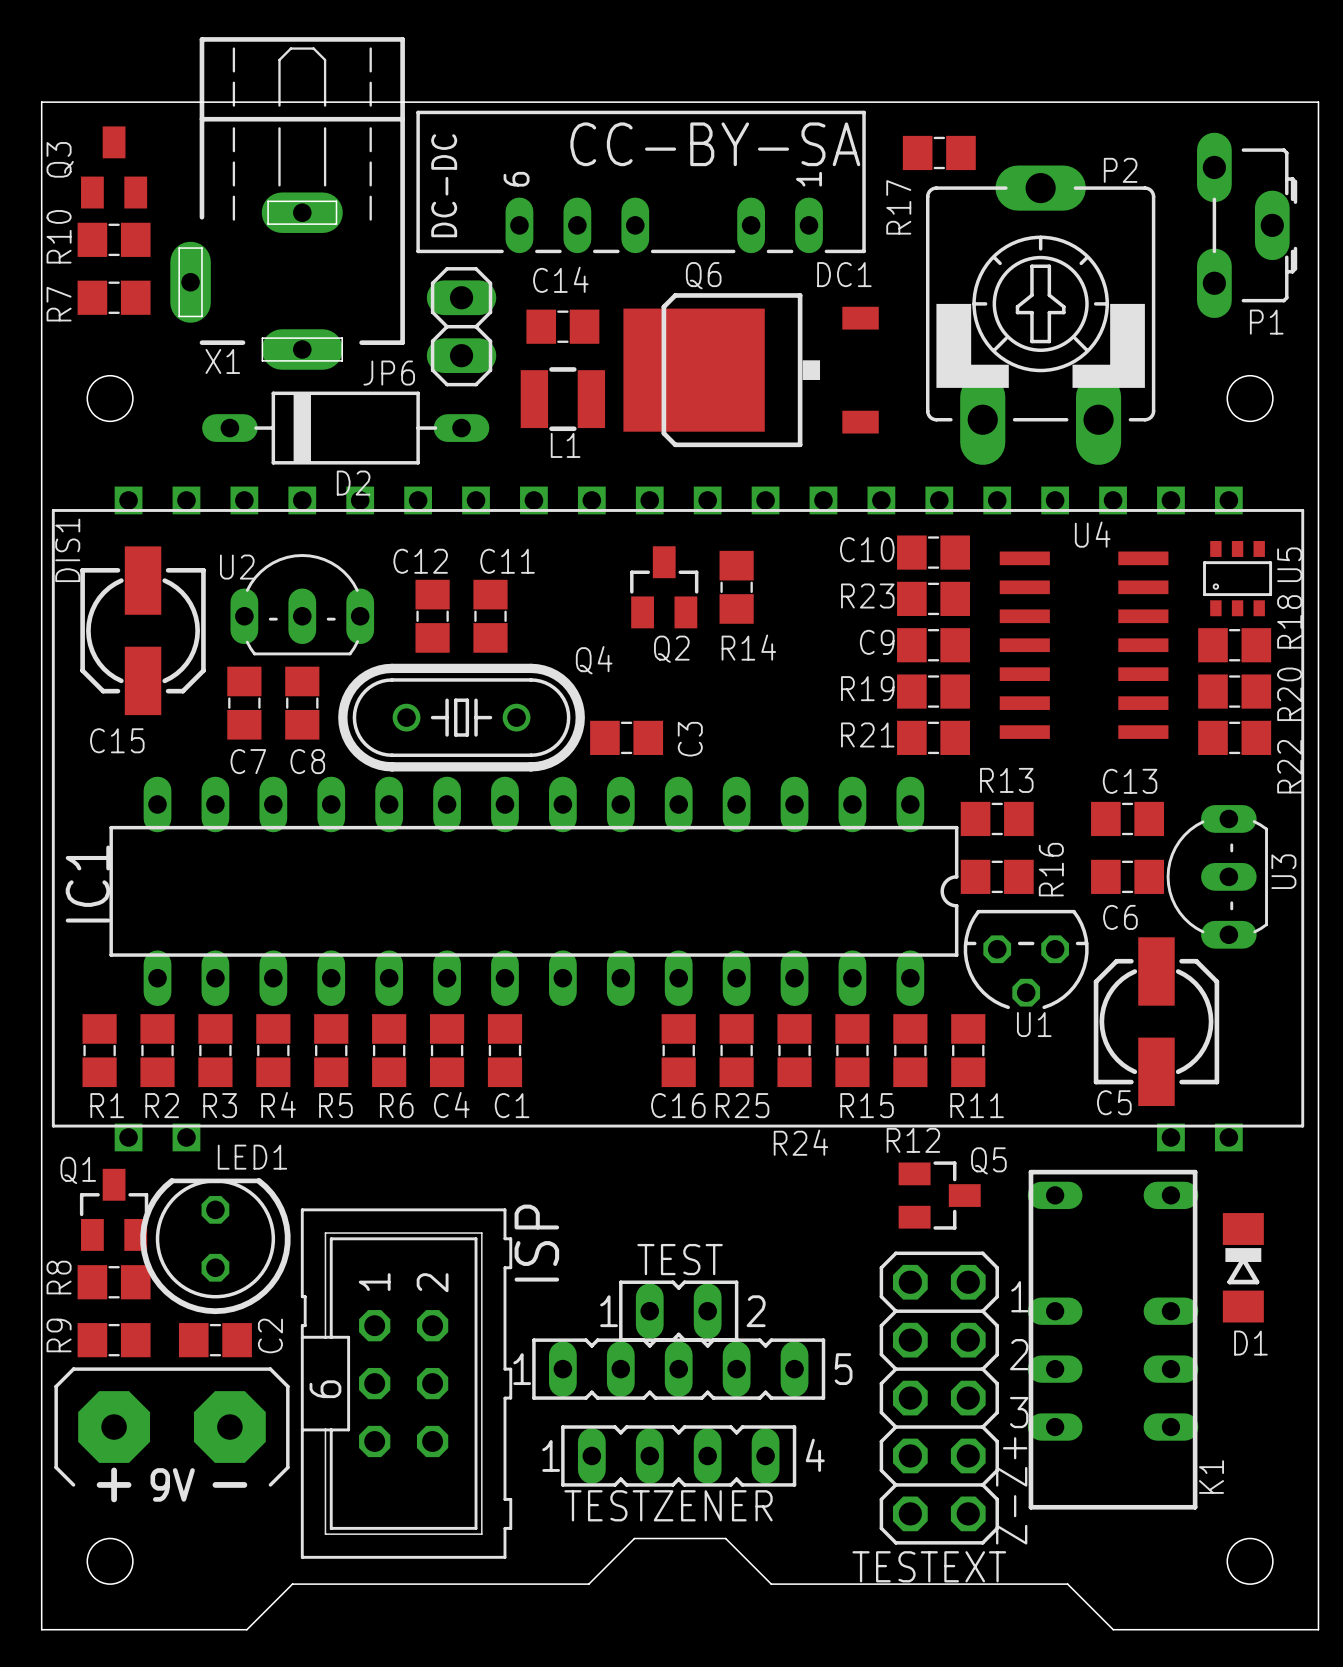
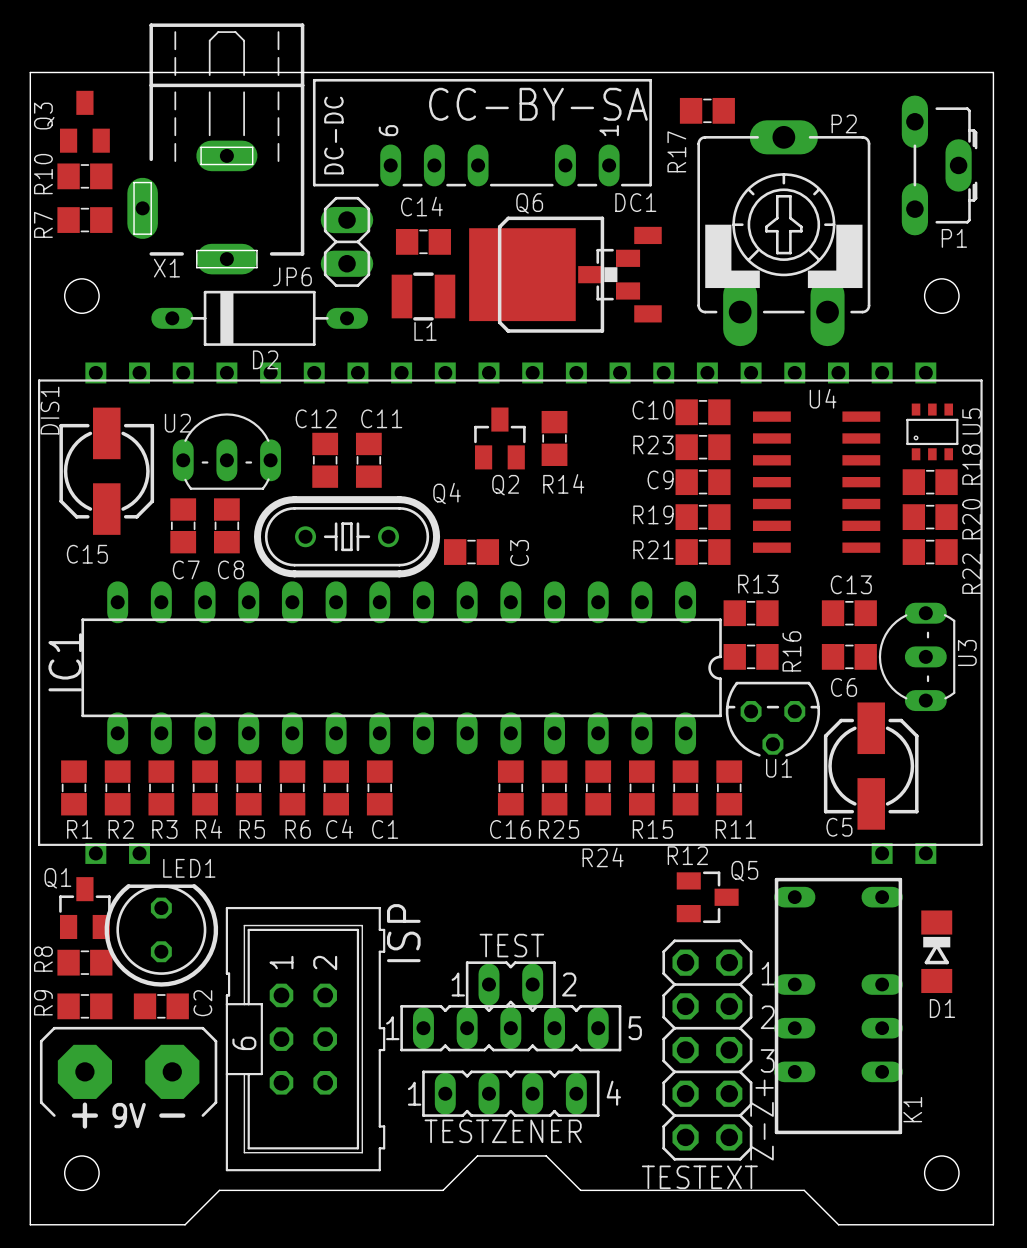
part: none -> (609, 274)

